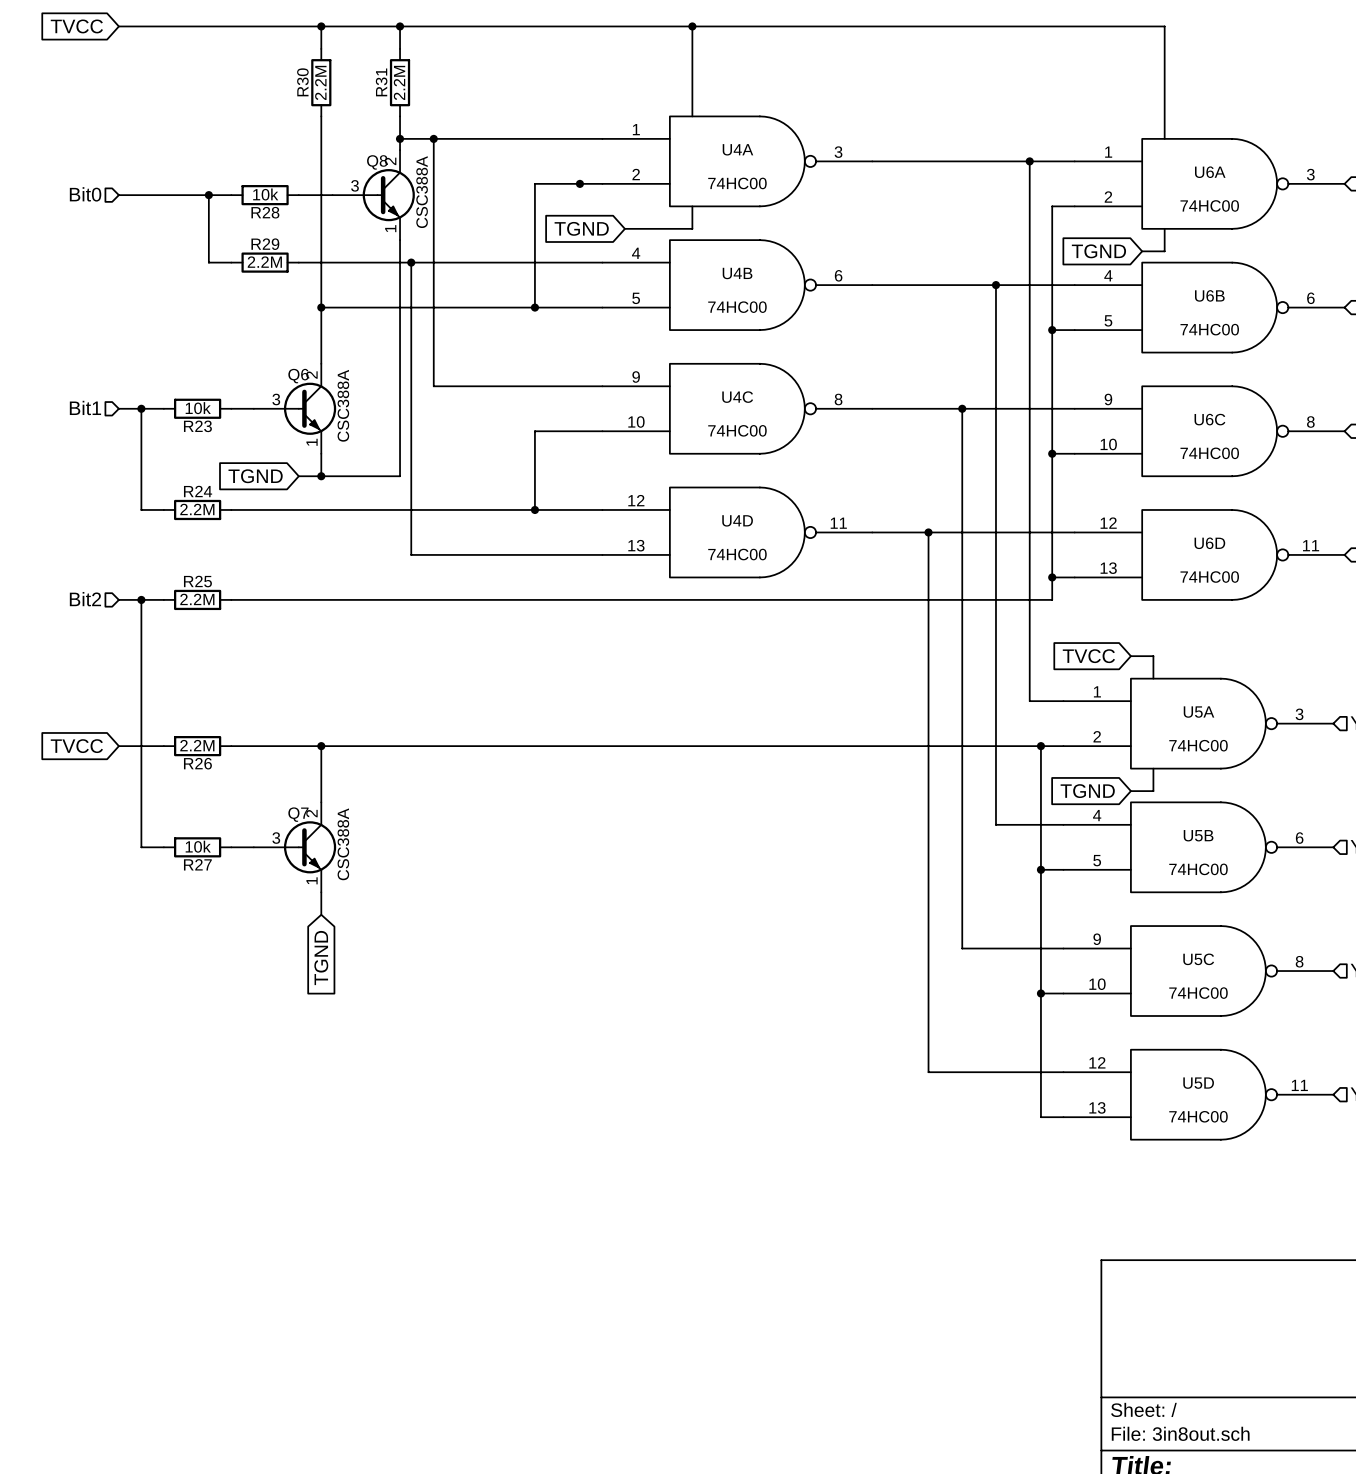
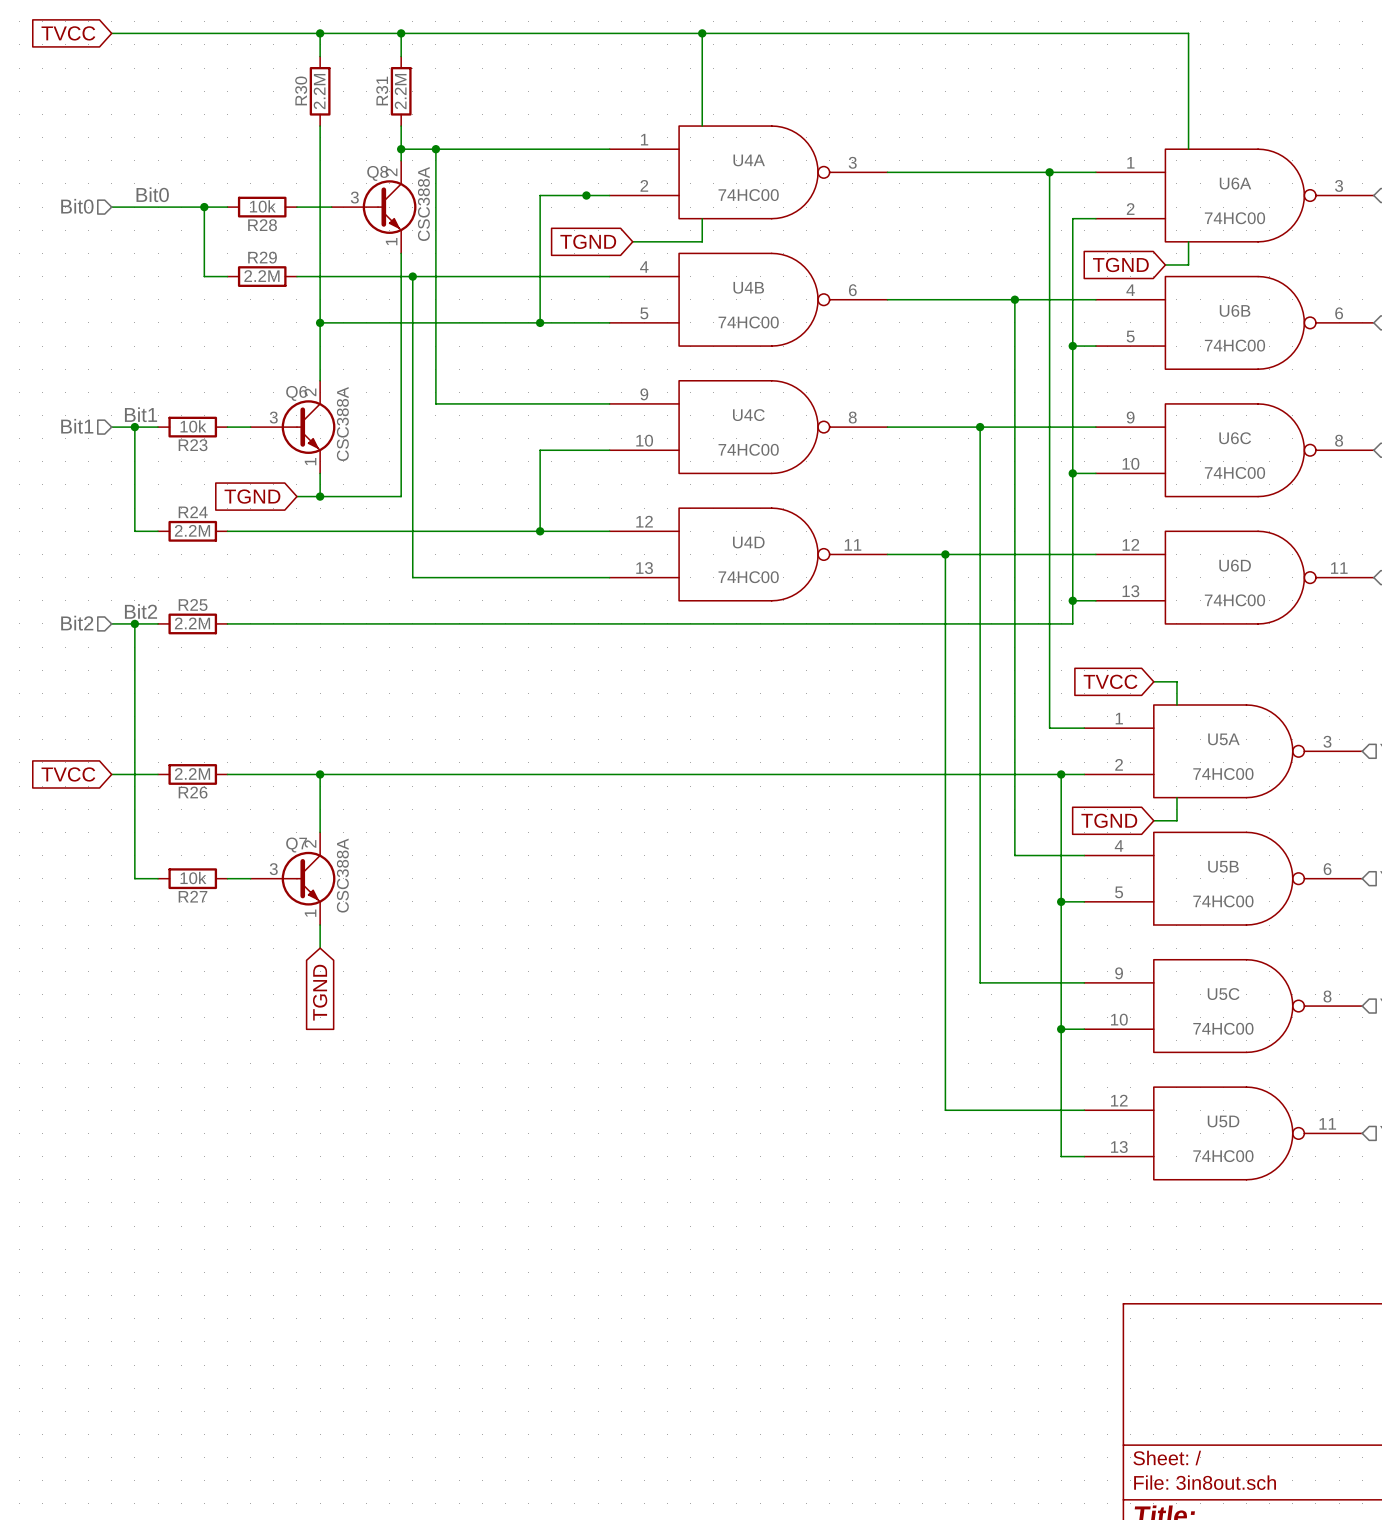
label: none -> Bit0 (152, 194)
label: none -> Bit1 (141, 414)
label: none -> Bit2 (141, 611)

